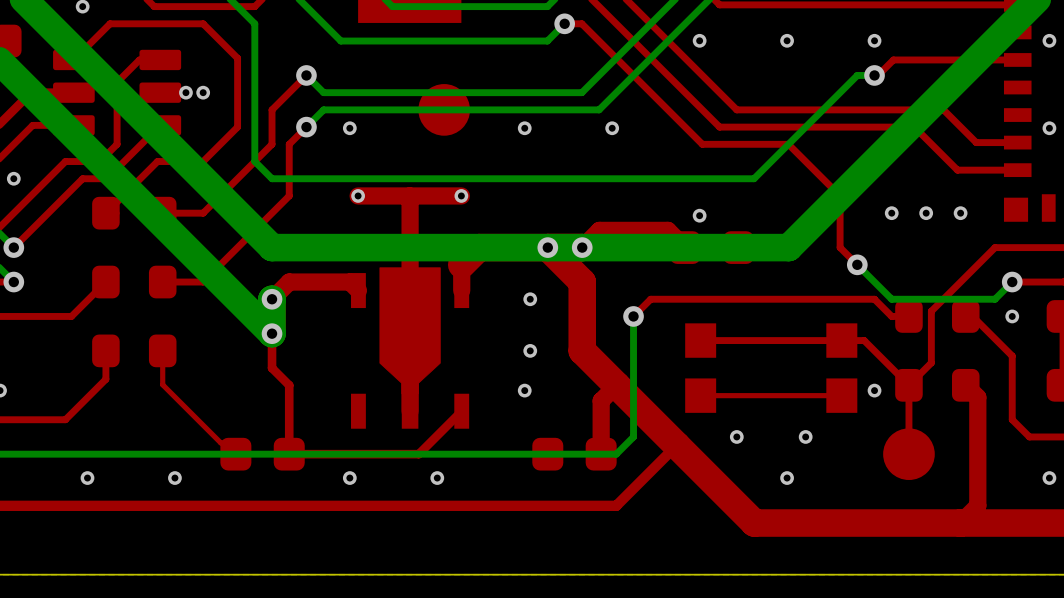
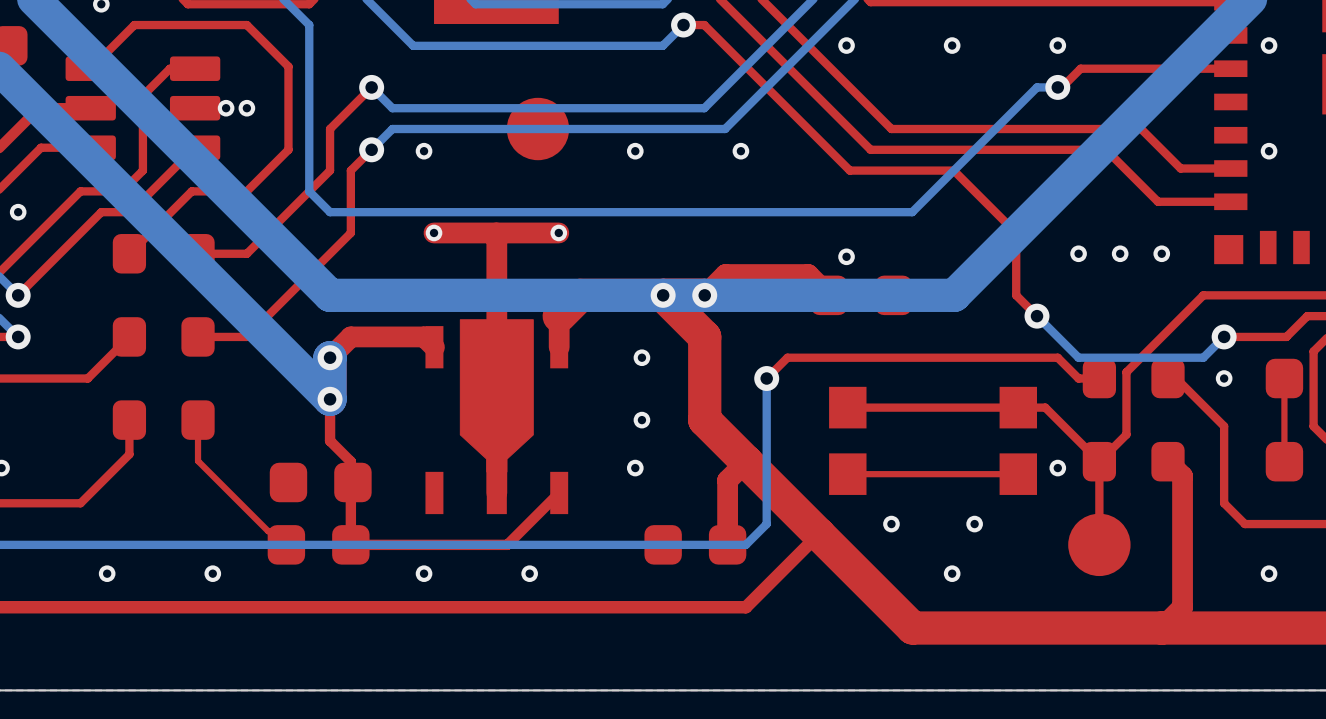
part: none -> (320, 482)

